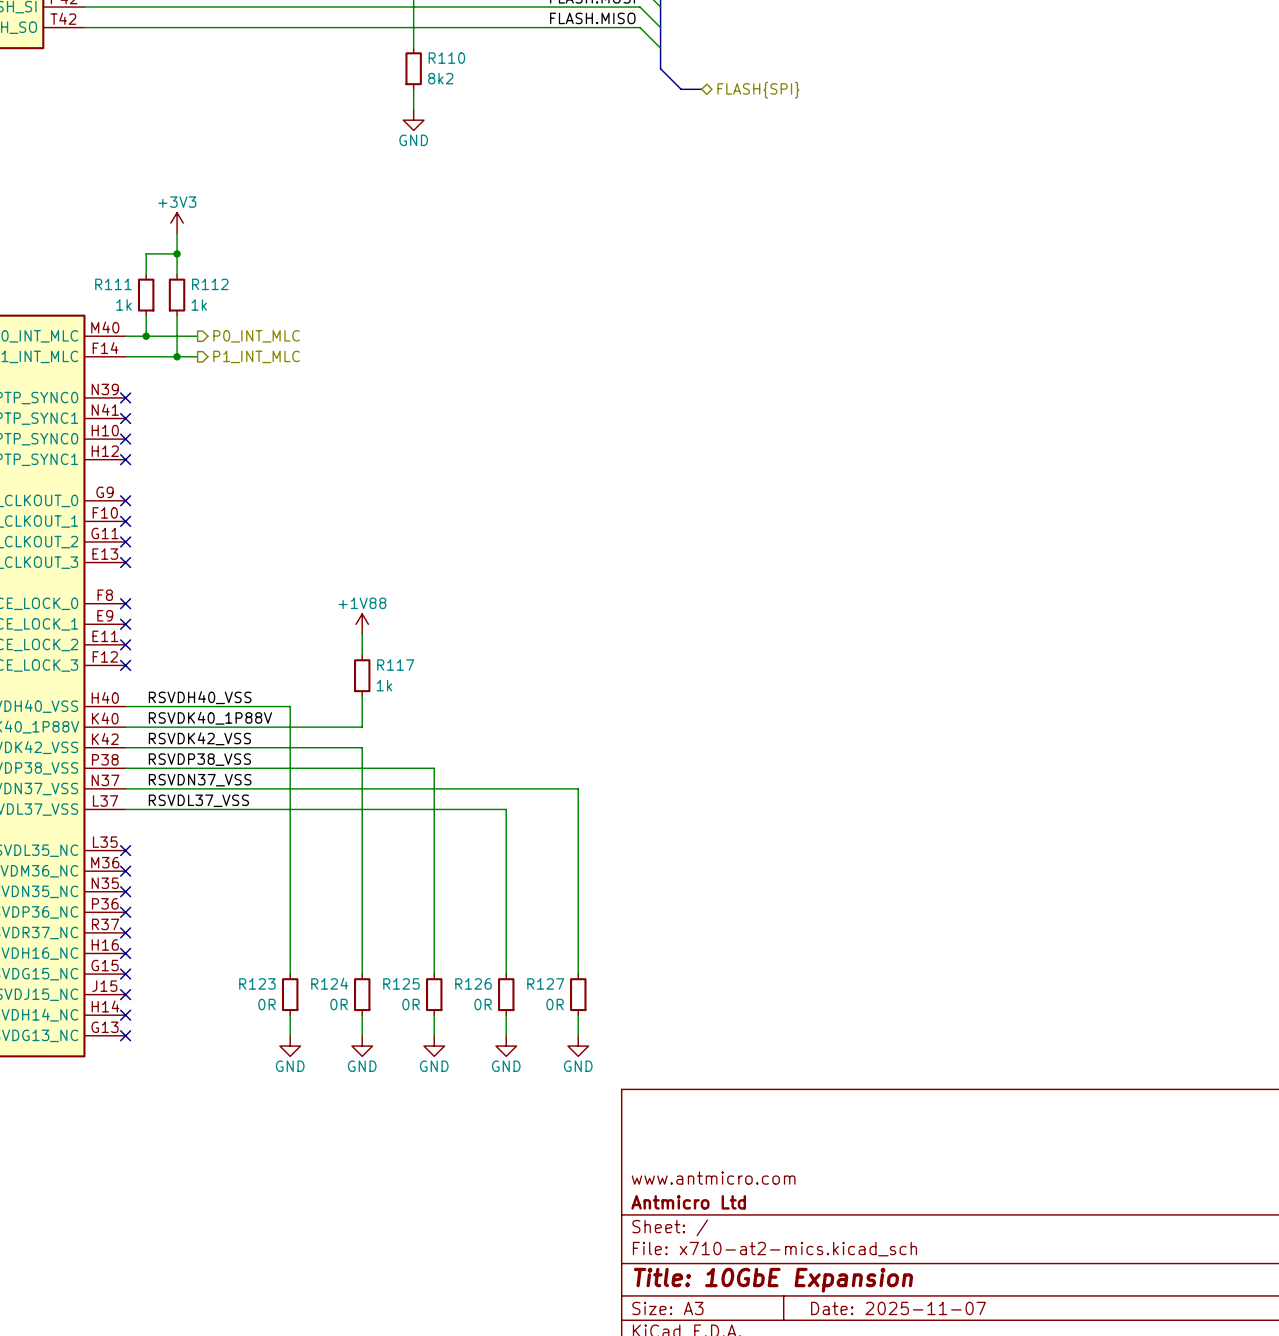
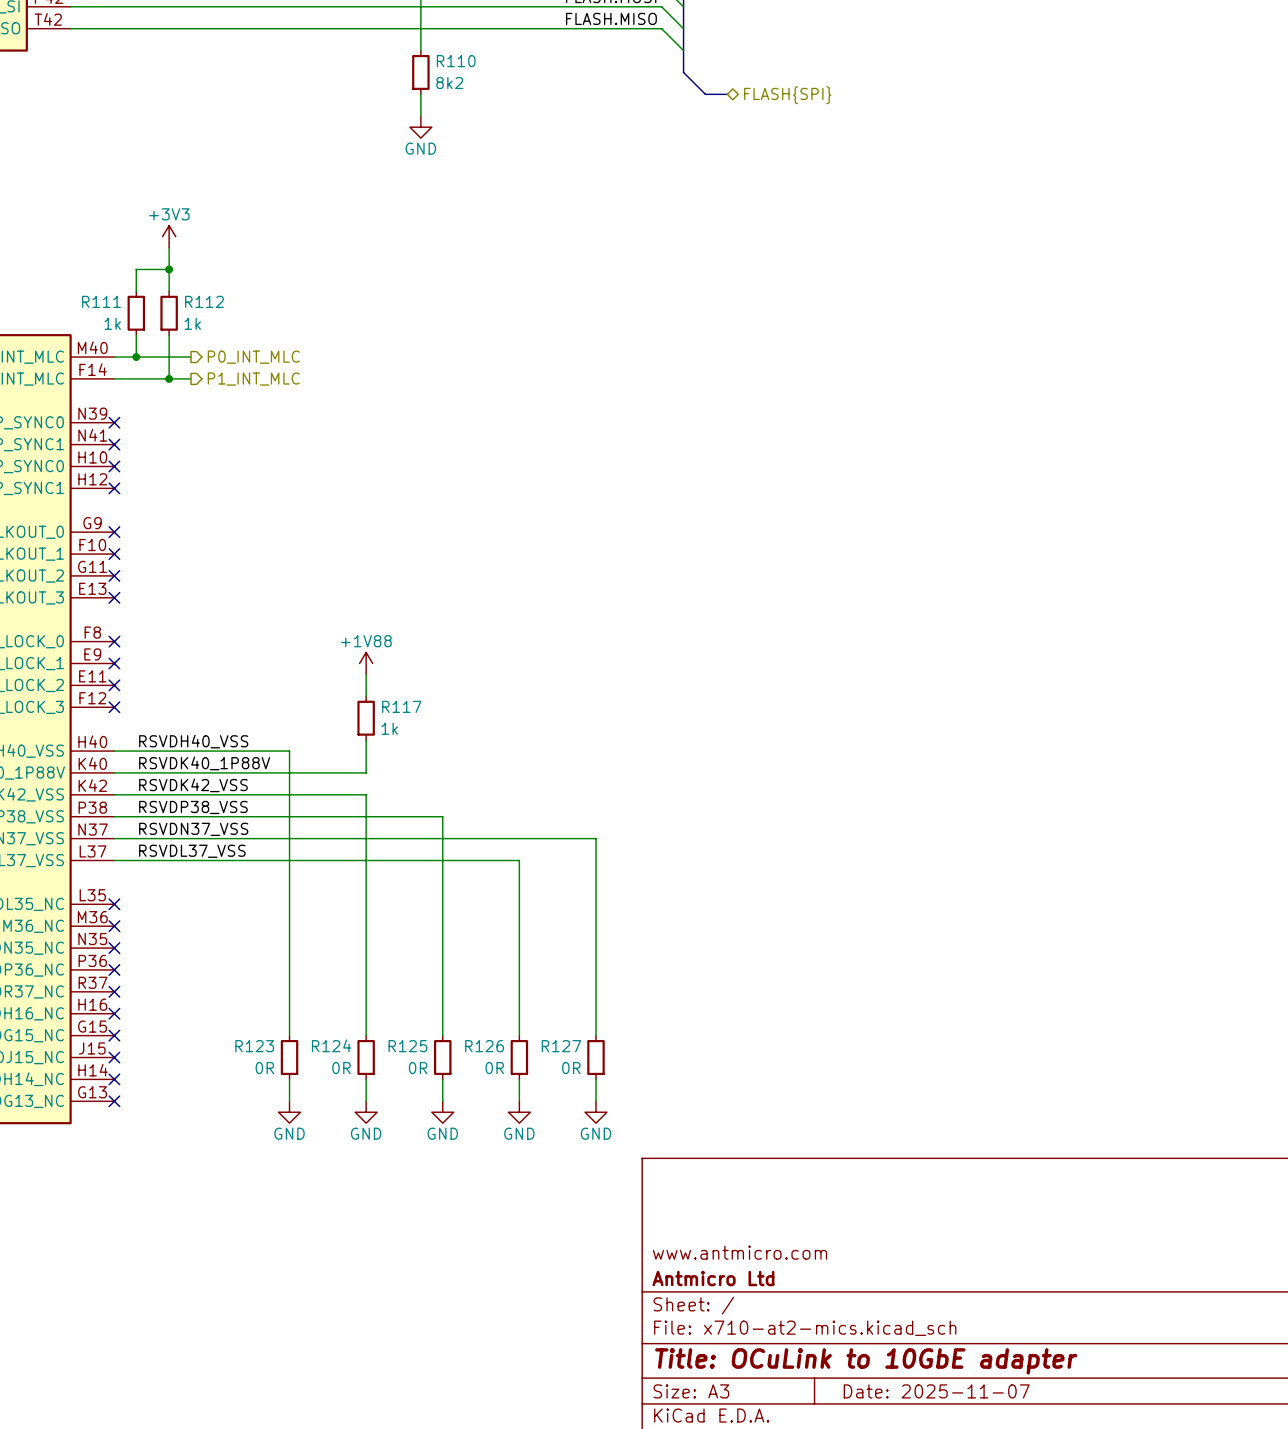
title block: Title: 10GbE Expansion (773, 1280) -> Title: OCuLink to 10GbE adapter (866, 1361)

